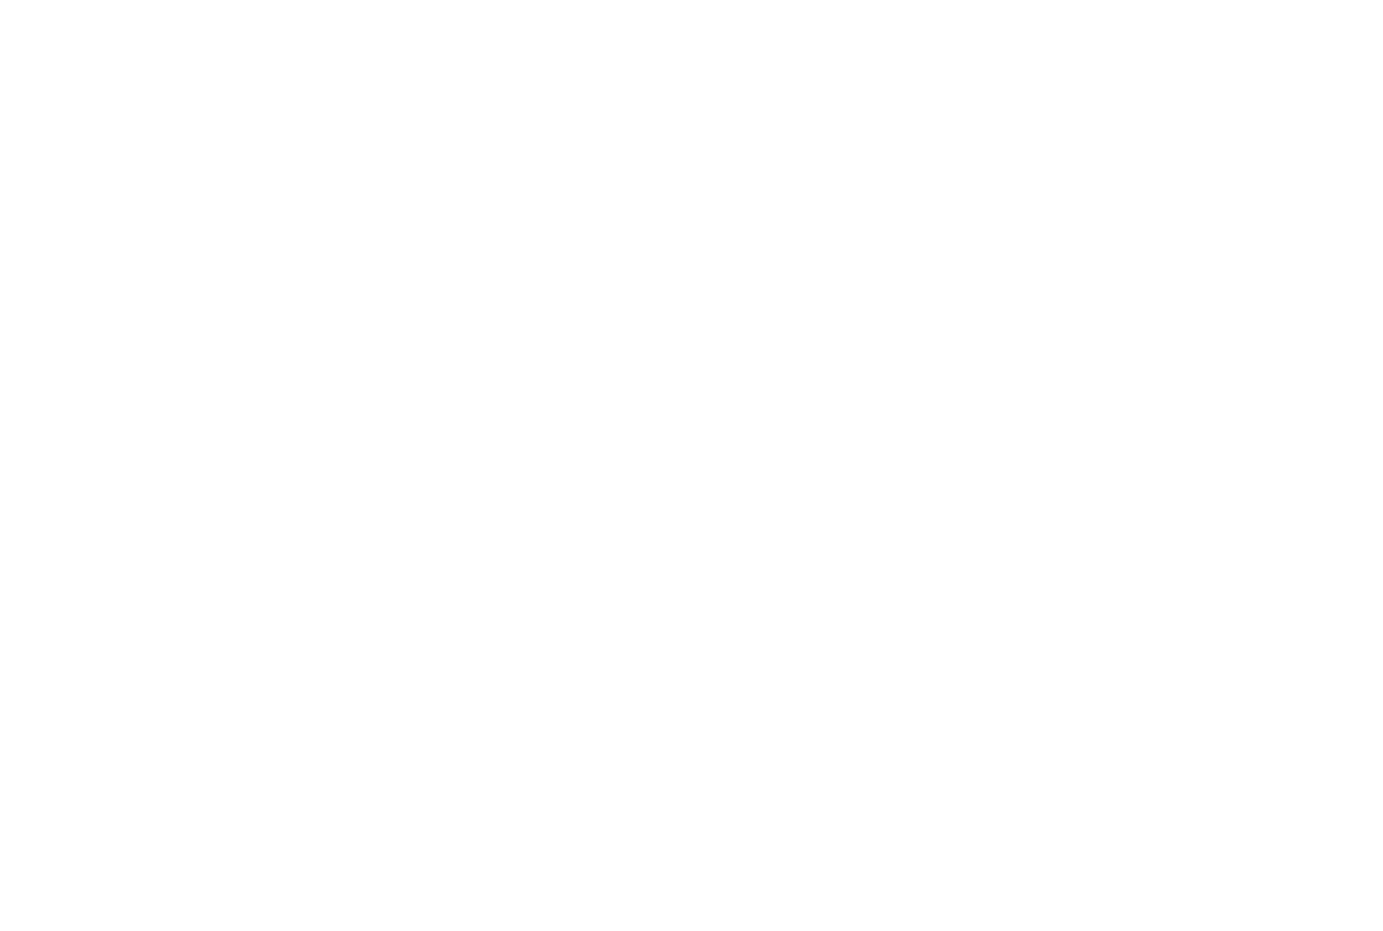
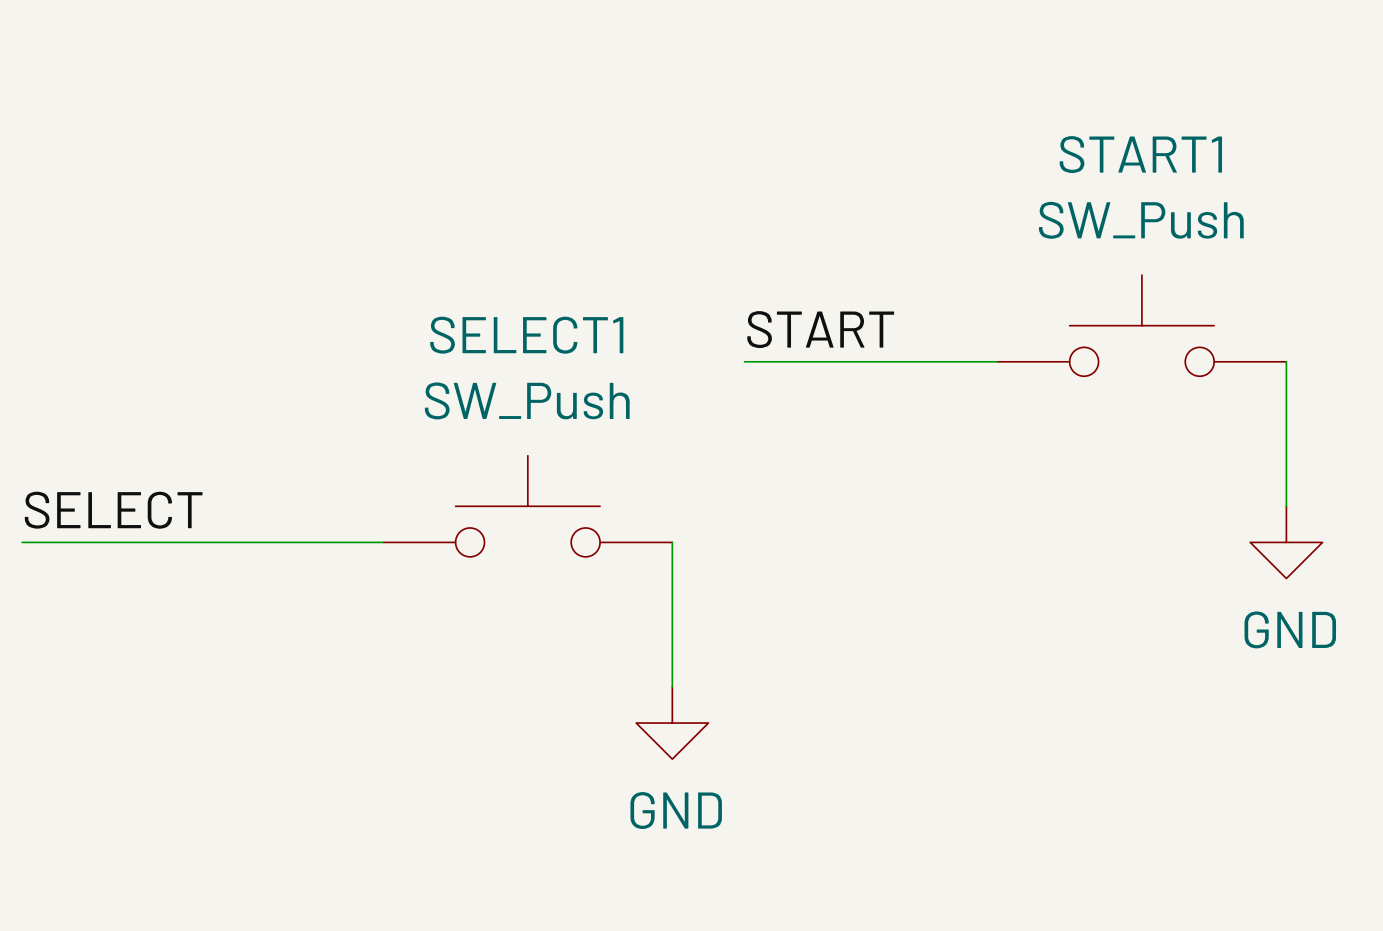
START1: none -> SW_Push (1141, 325)
label: none -> START (820, 329)
wire: none -> (744, 361) (997, 361)
wire: none -> (1286, 361) (1286, 506)
SELECT1: none -> SW_Push (527, 506)
label: none -> SELECT (113, 510)
wire: none -> (22, 542) (383, 542)
wire: none -> (672, 542) (672, 686)
power symbol: none -> GND (1286, 542)
power symbol: none -> GND (672, 723)

